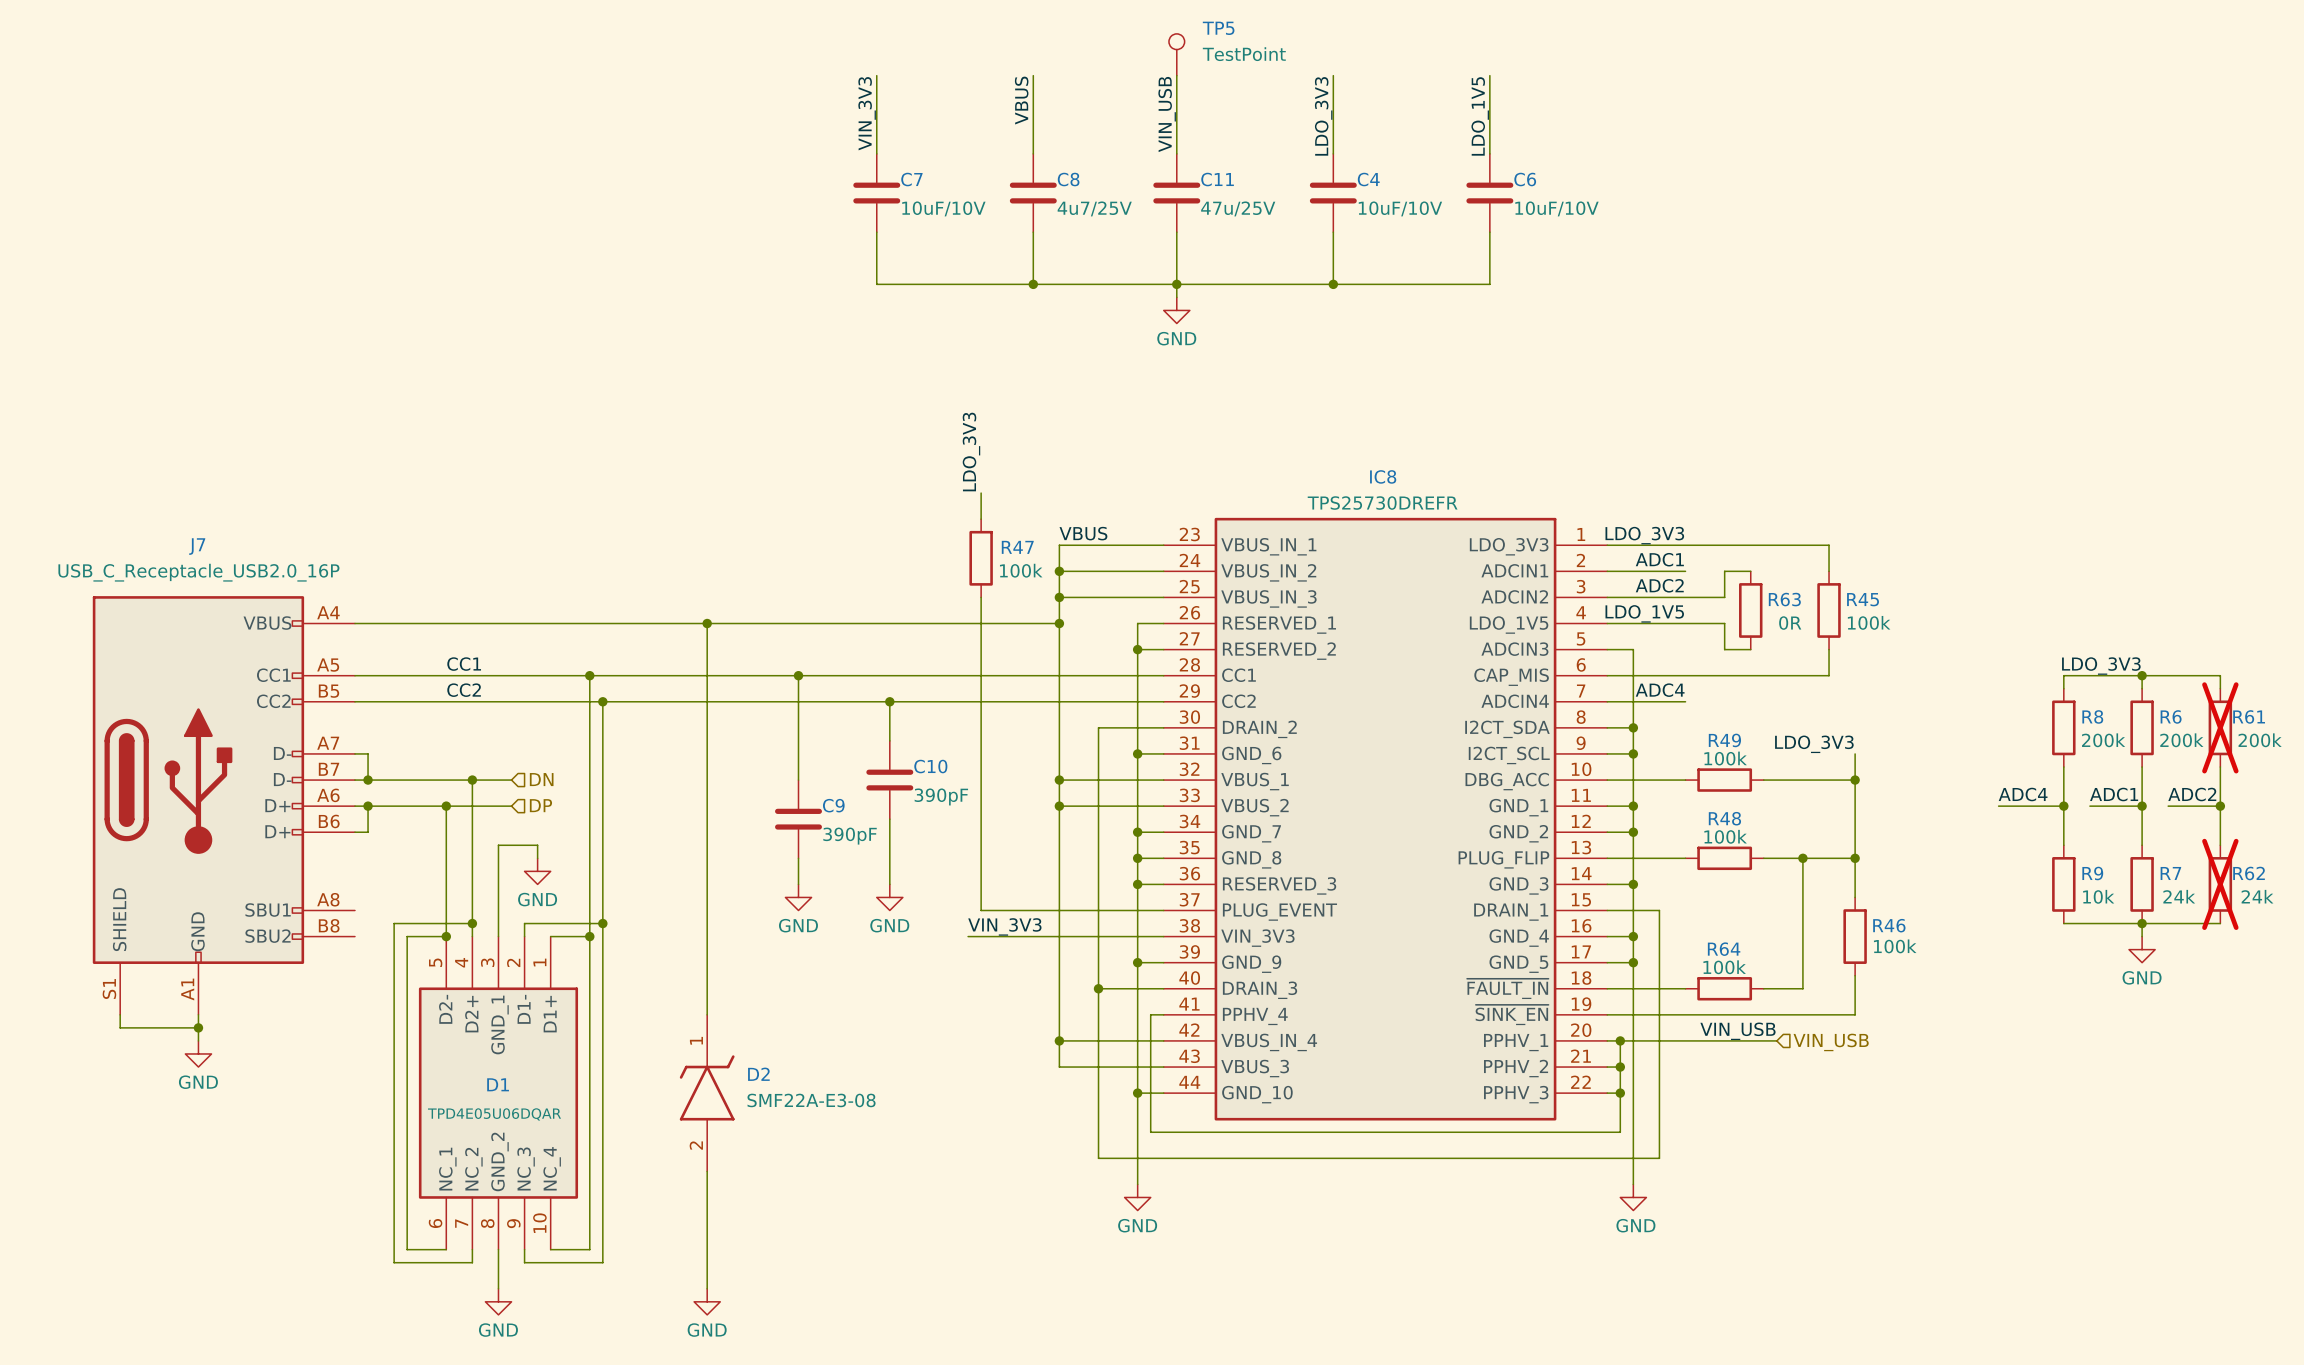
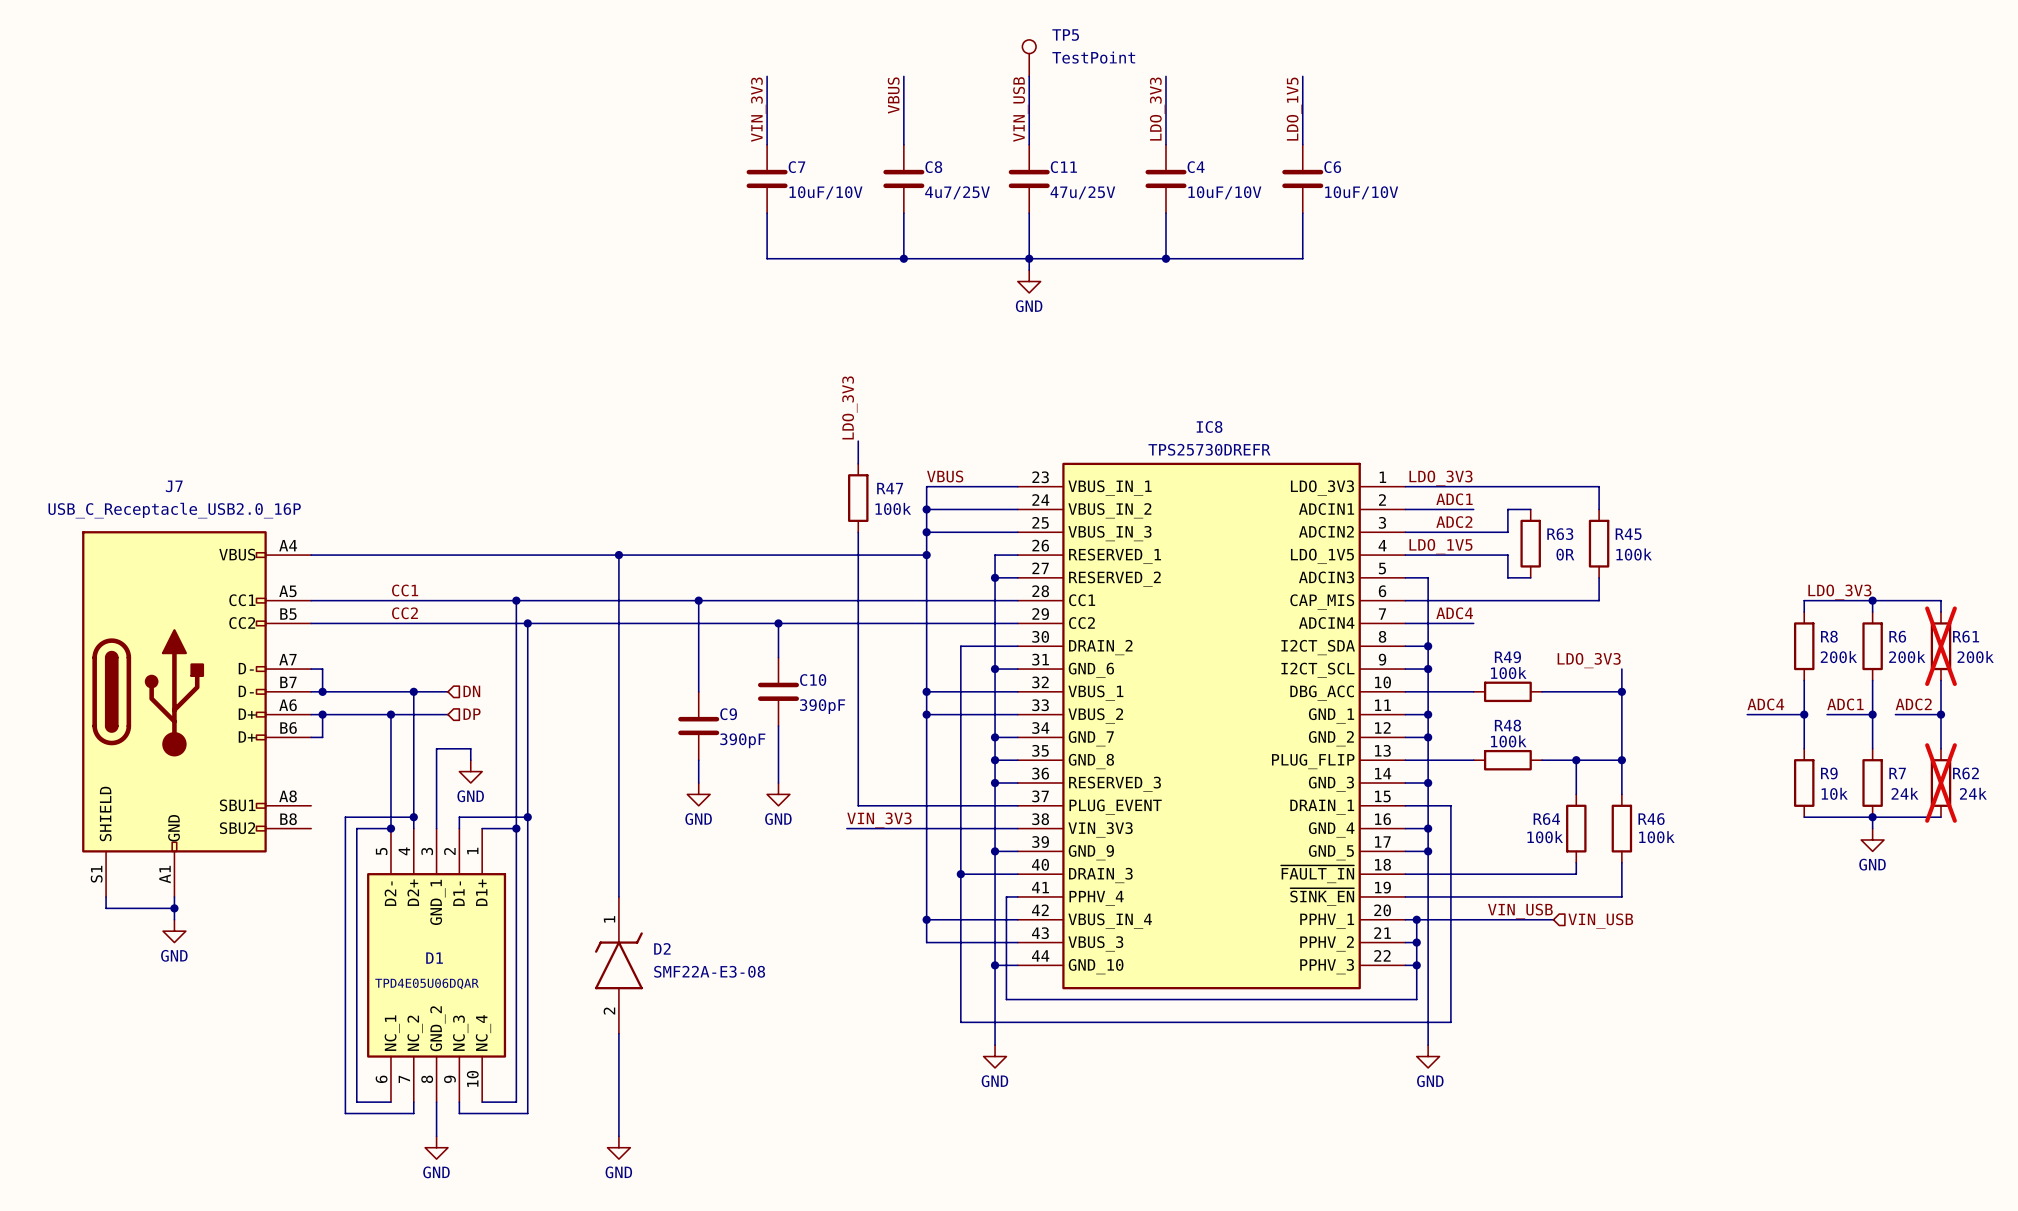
wire: (1802, 897) (1802, 975) -> none
R64 name position: R64 (1724, 949) -> R64 (1546, 819)
R64 value position: 100k (1724, 967) -> 100k (1545, 837)
wire: none -> (1473, 874) (1542, 874)
R64 rotation: 0° (1724, 988) -> 90° clockwise (1576, 828)
R64 position: (1724, 988) -> (1576, 828)

